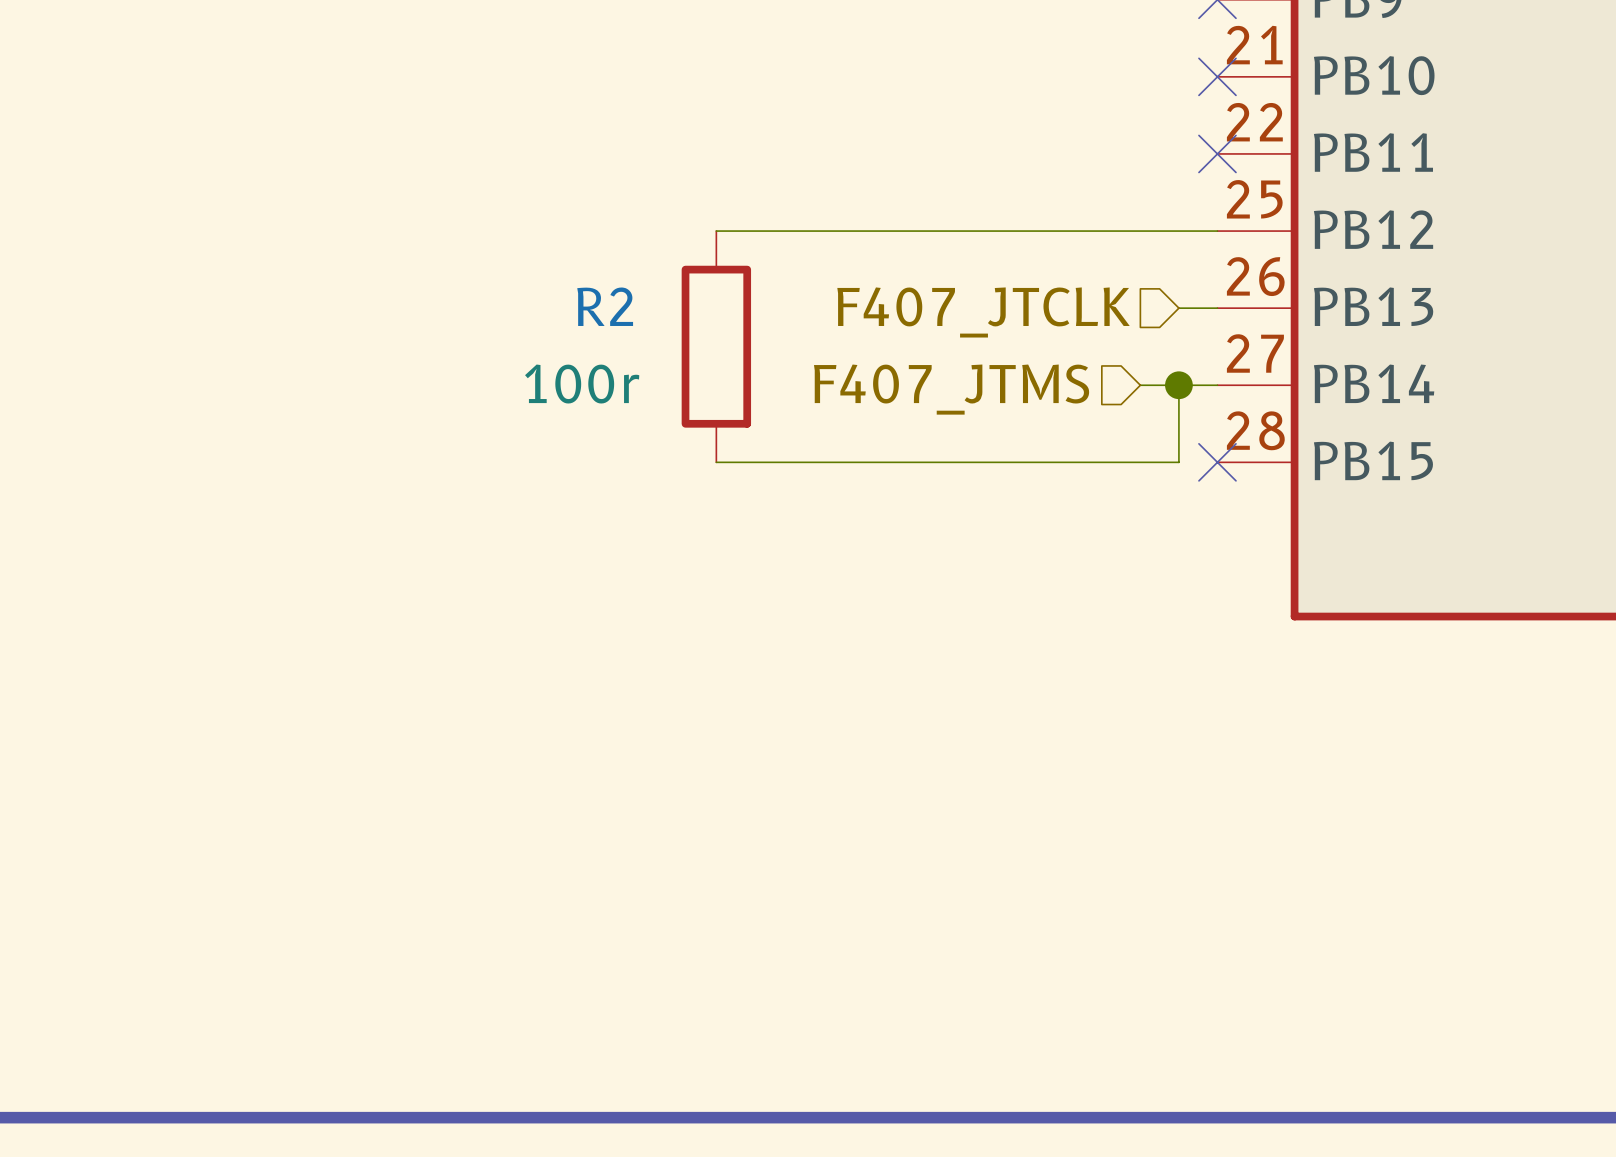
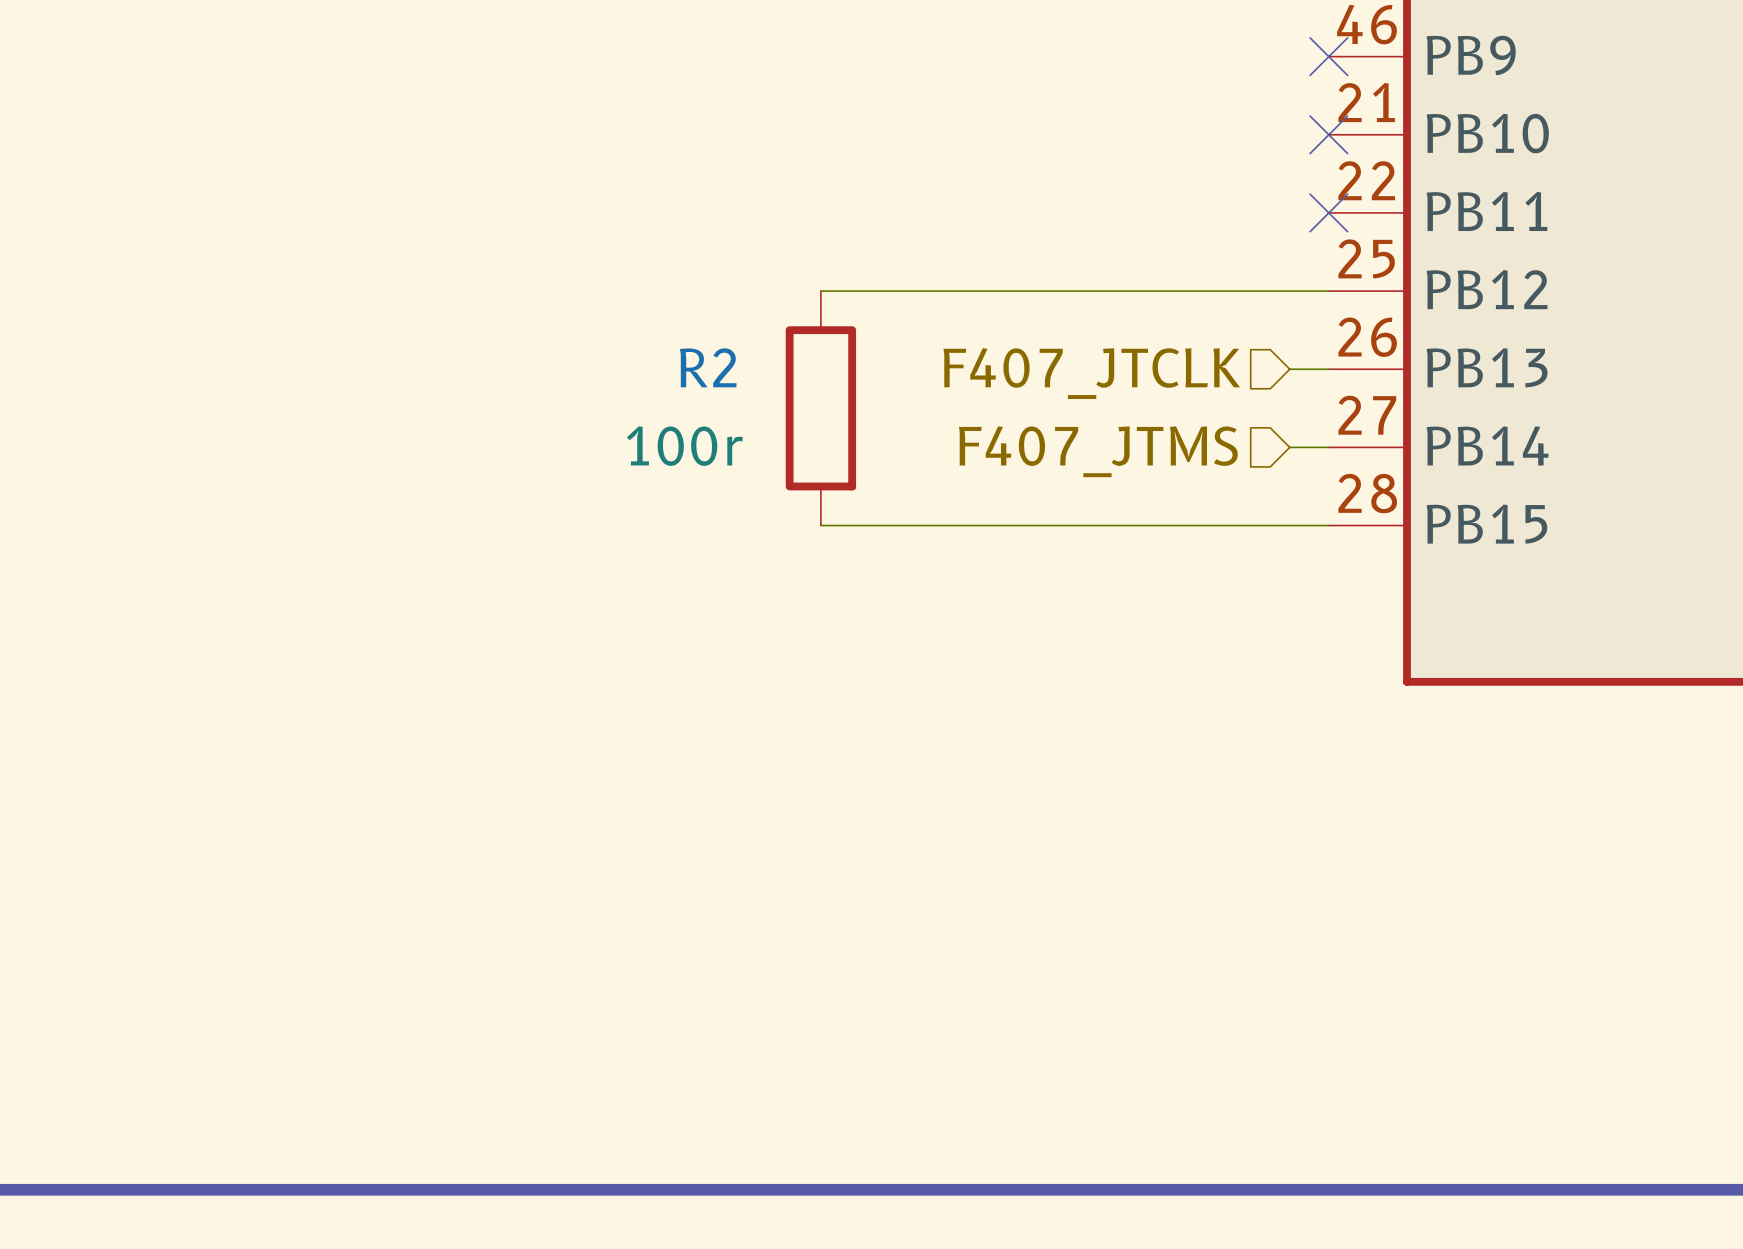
wire: (1140, 385) (1178, 385) (1178, 462) -> (1328, 525) (1289, 525)
junction: (1178, 385) -> none
hierarchical label position: F407_JTMS (951, 389) -> F407_JTMS (1098, 451)
no-connect mark: (1217, 462) -> none

